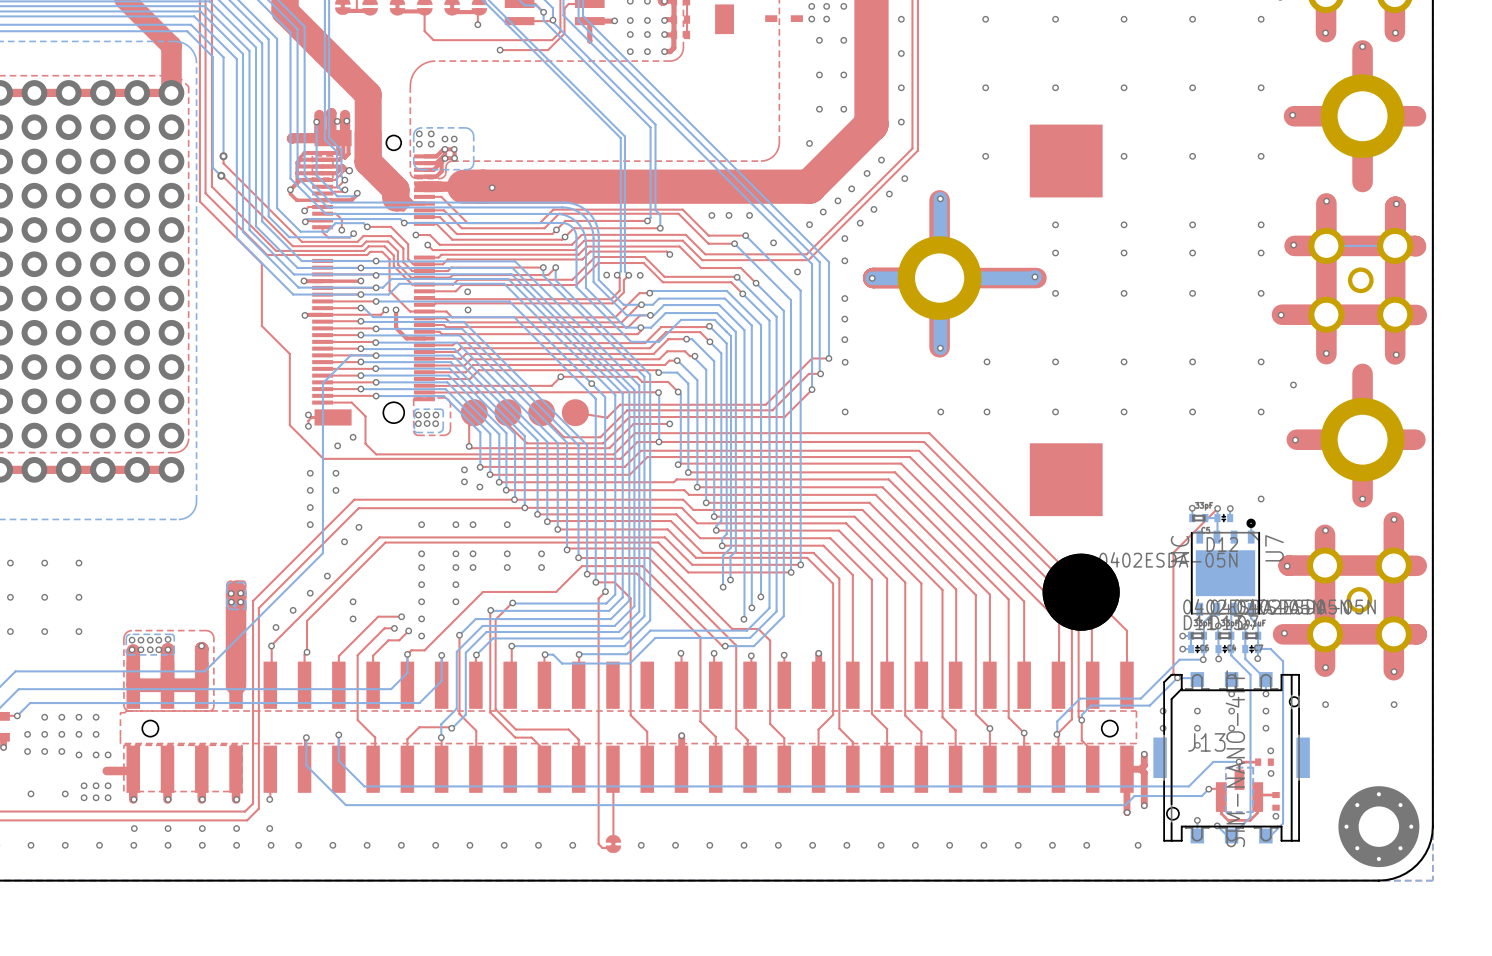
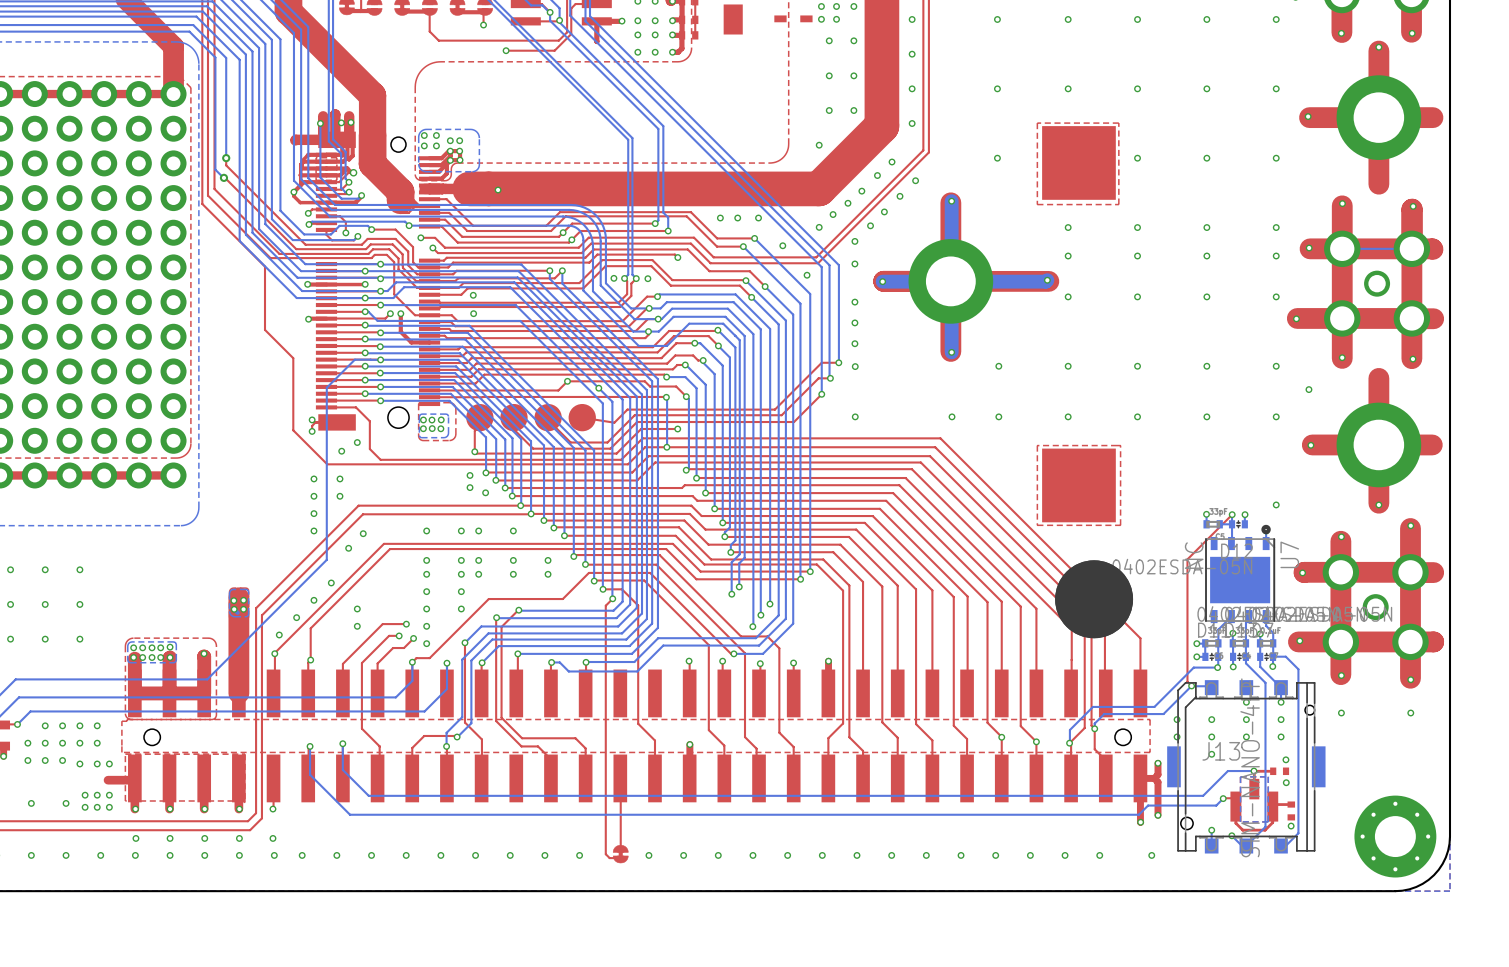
top zone outline: none -> (1118, 123) (1037, 123) (1037, 204) (1118, 204) (1118, 123)
top zone outline: none -> (1120, 445) (1037, 445) (1037, 525) (1120, 525) (1120, 445)

